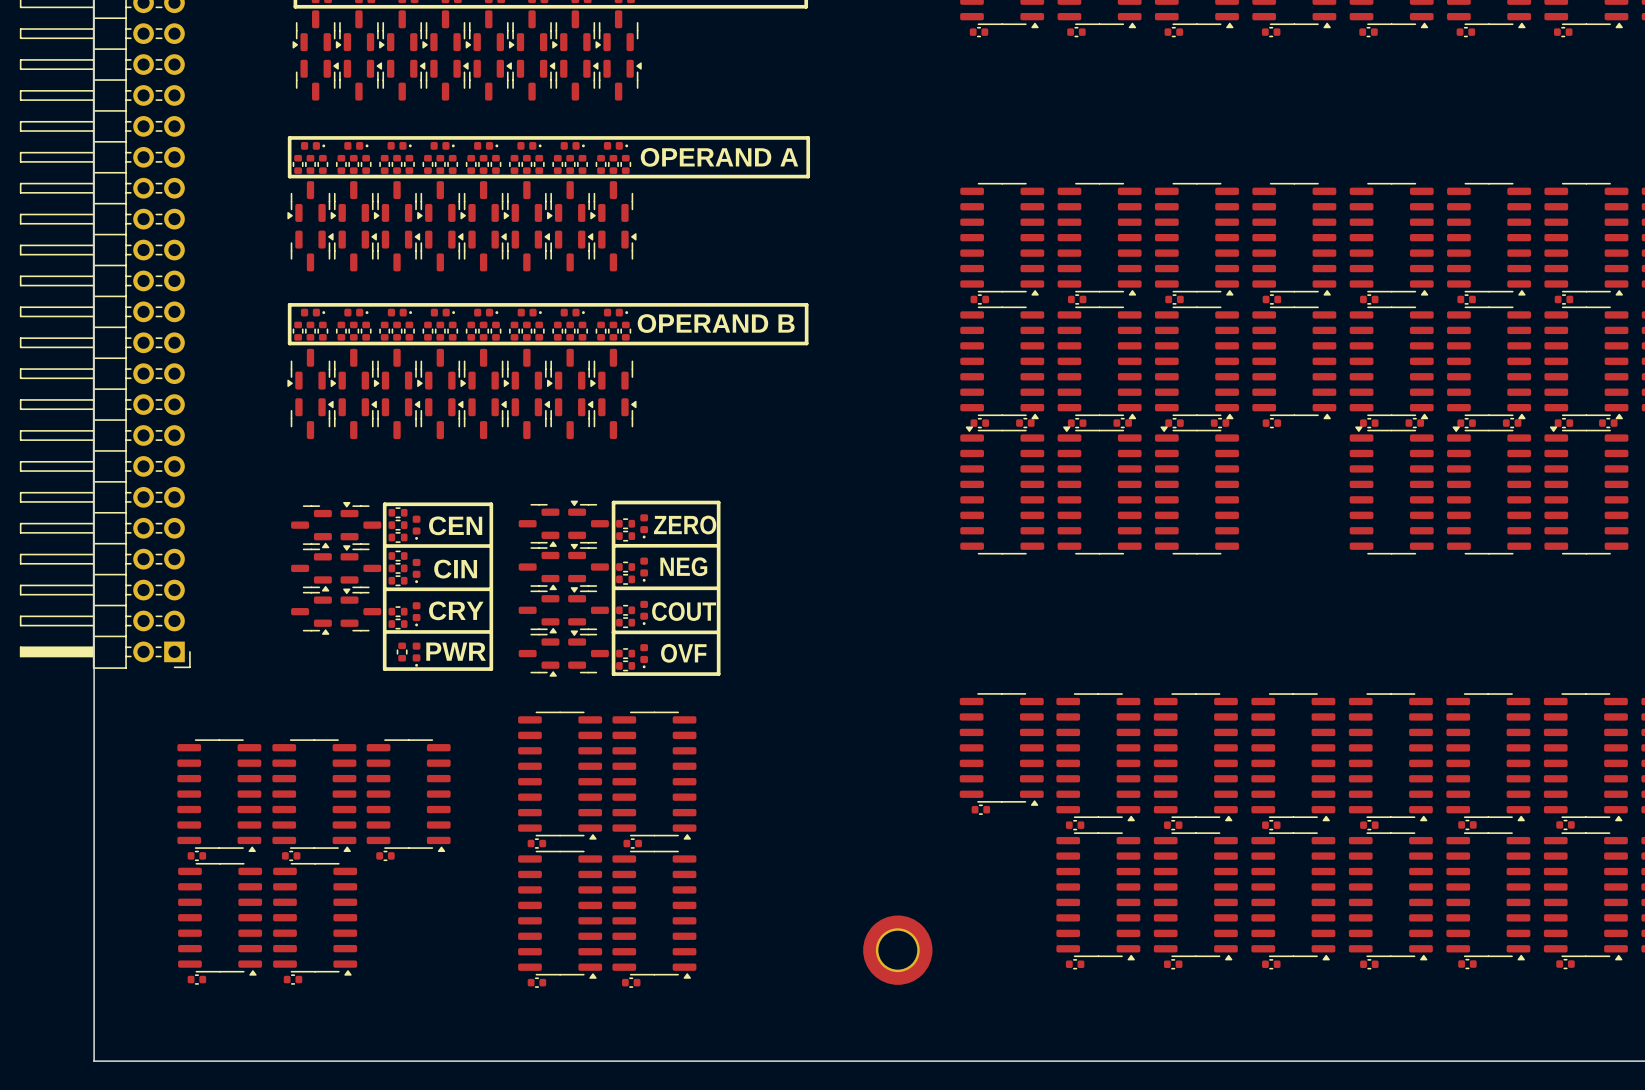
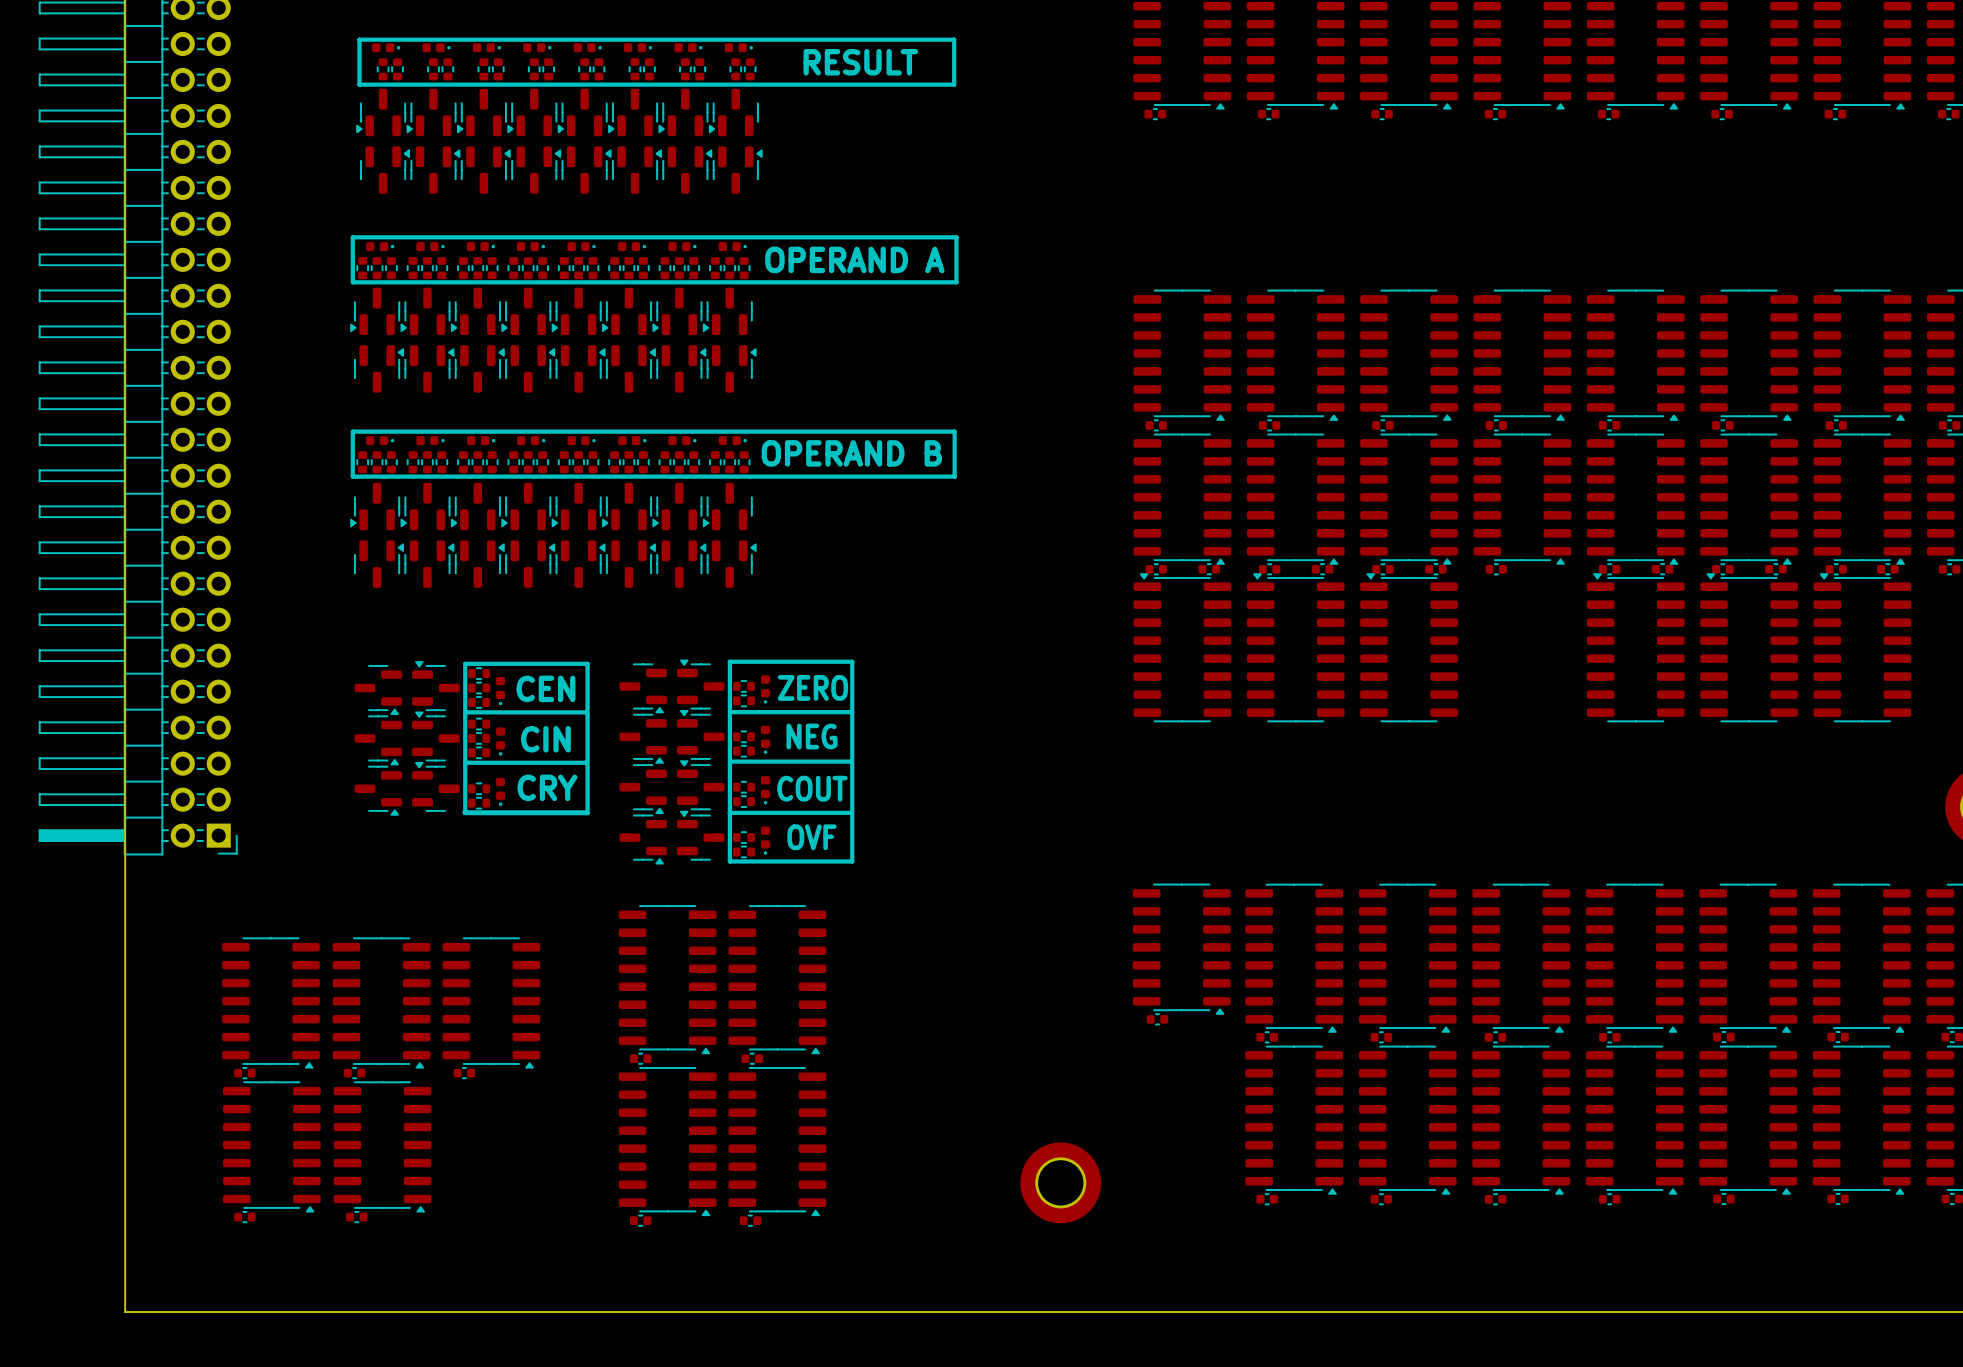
line: (386, 504) (384, 504) (384, 669) (491, 669) (491, 632) -> (465, 663) (465, 813) (587, 813)
text: PWR (456, 651) -> none
part: (402, 652) -> none
part: (416, 654) -> none

